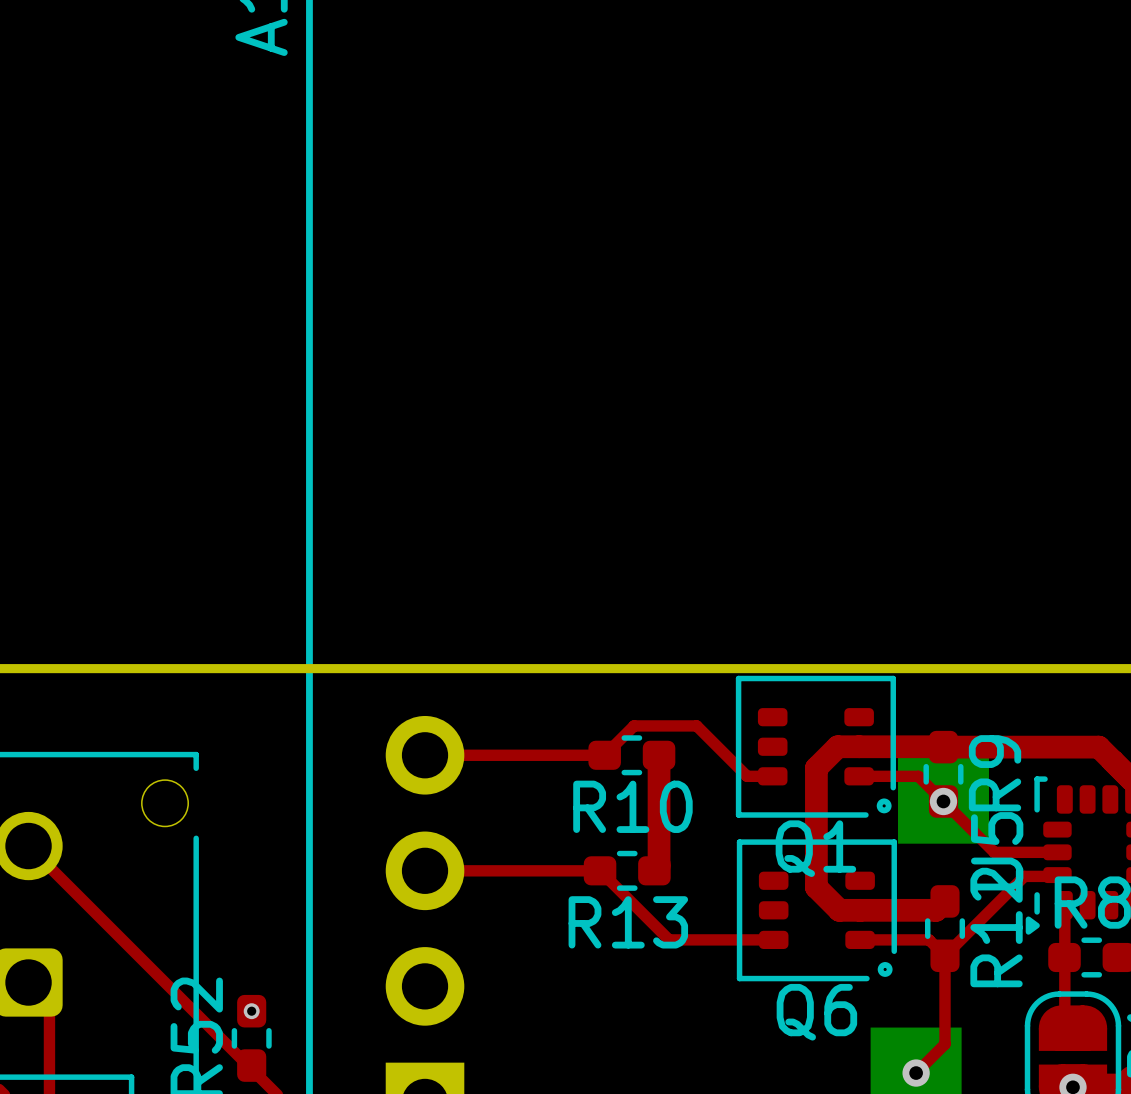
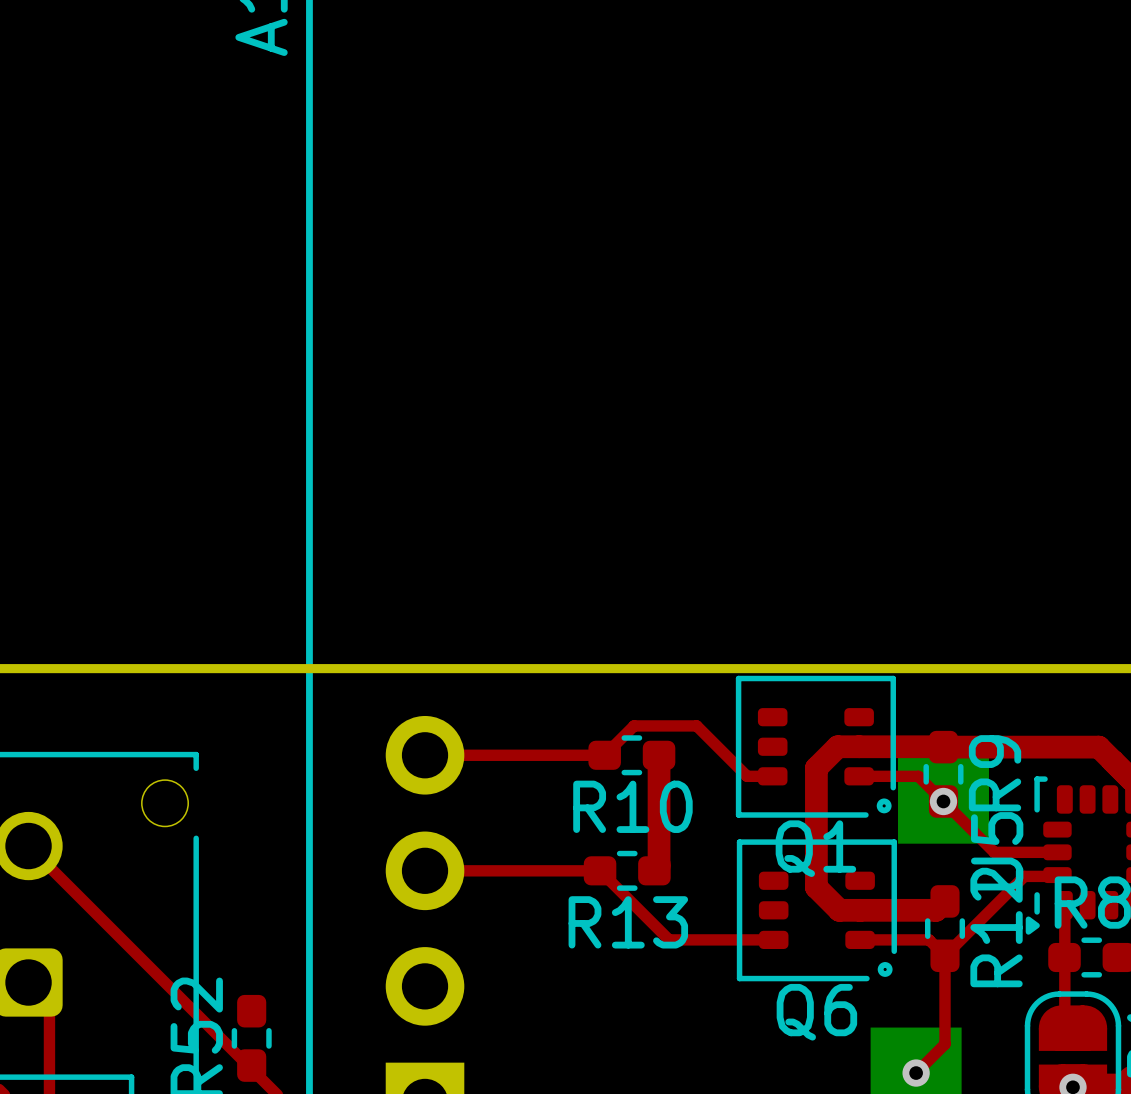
via: (251, 1011) -> none

